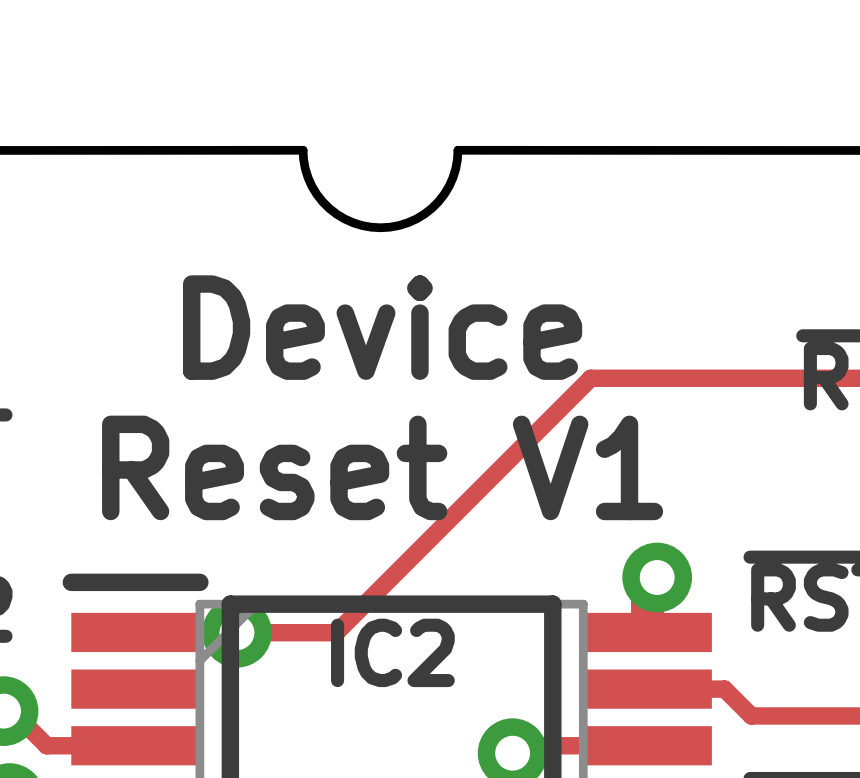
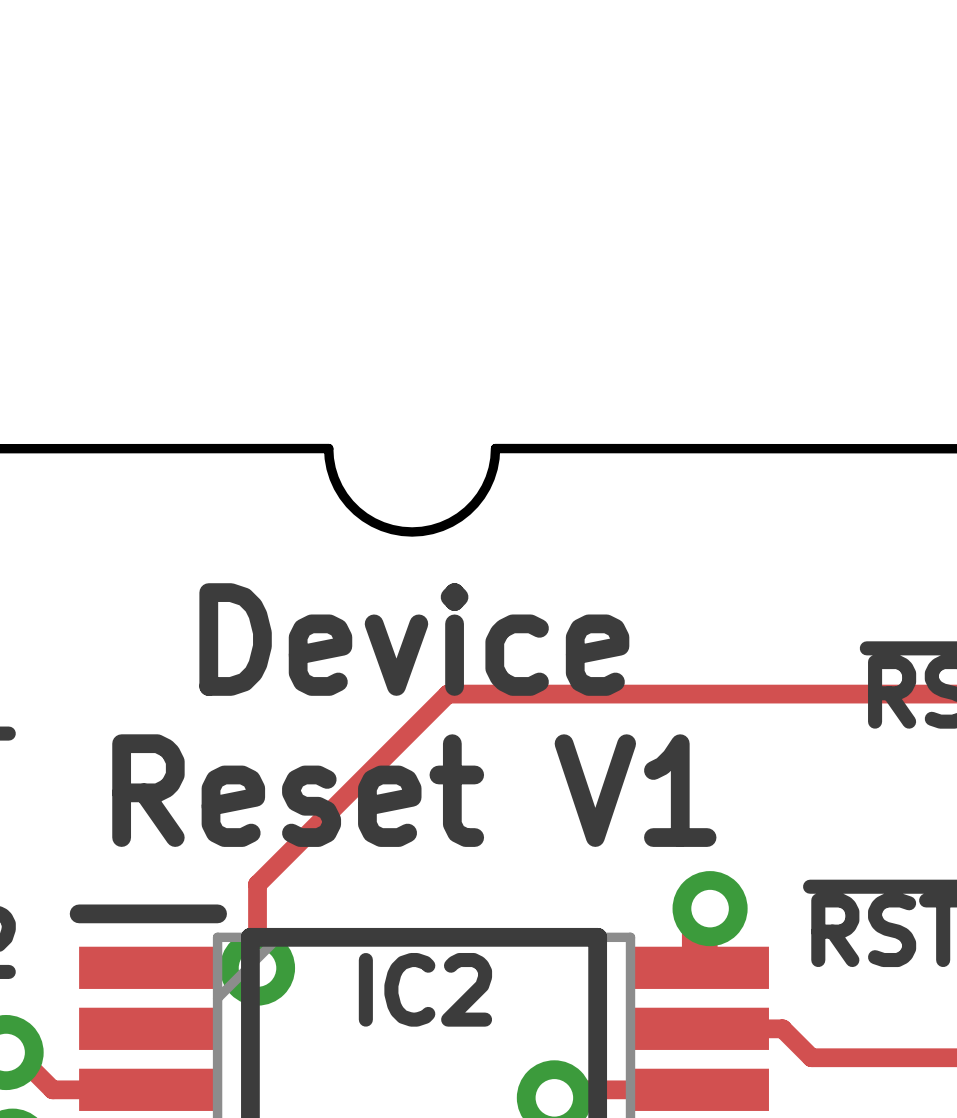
track: (590, 378) (336, 632) (236, 632) -> (638, 694) (447, 694) (257, 884) (257, 968)

